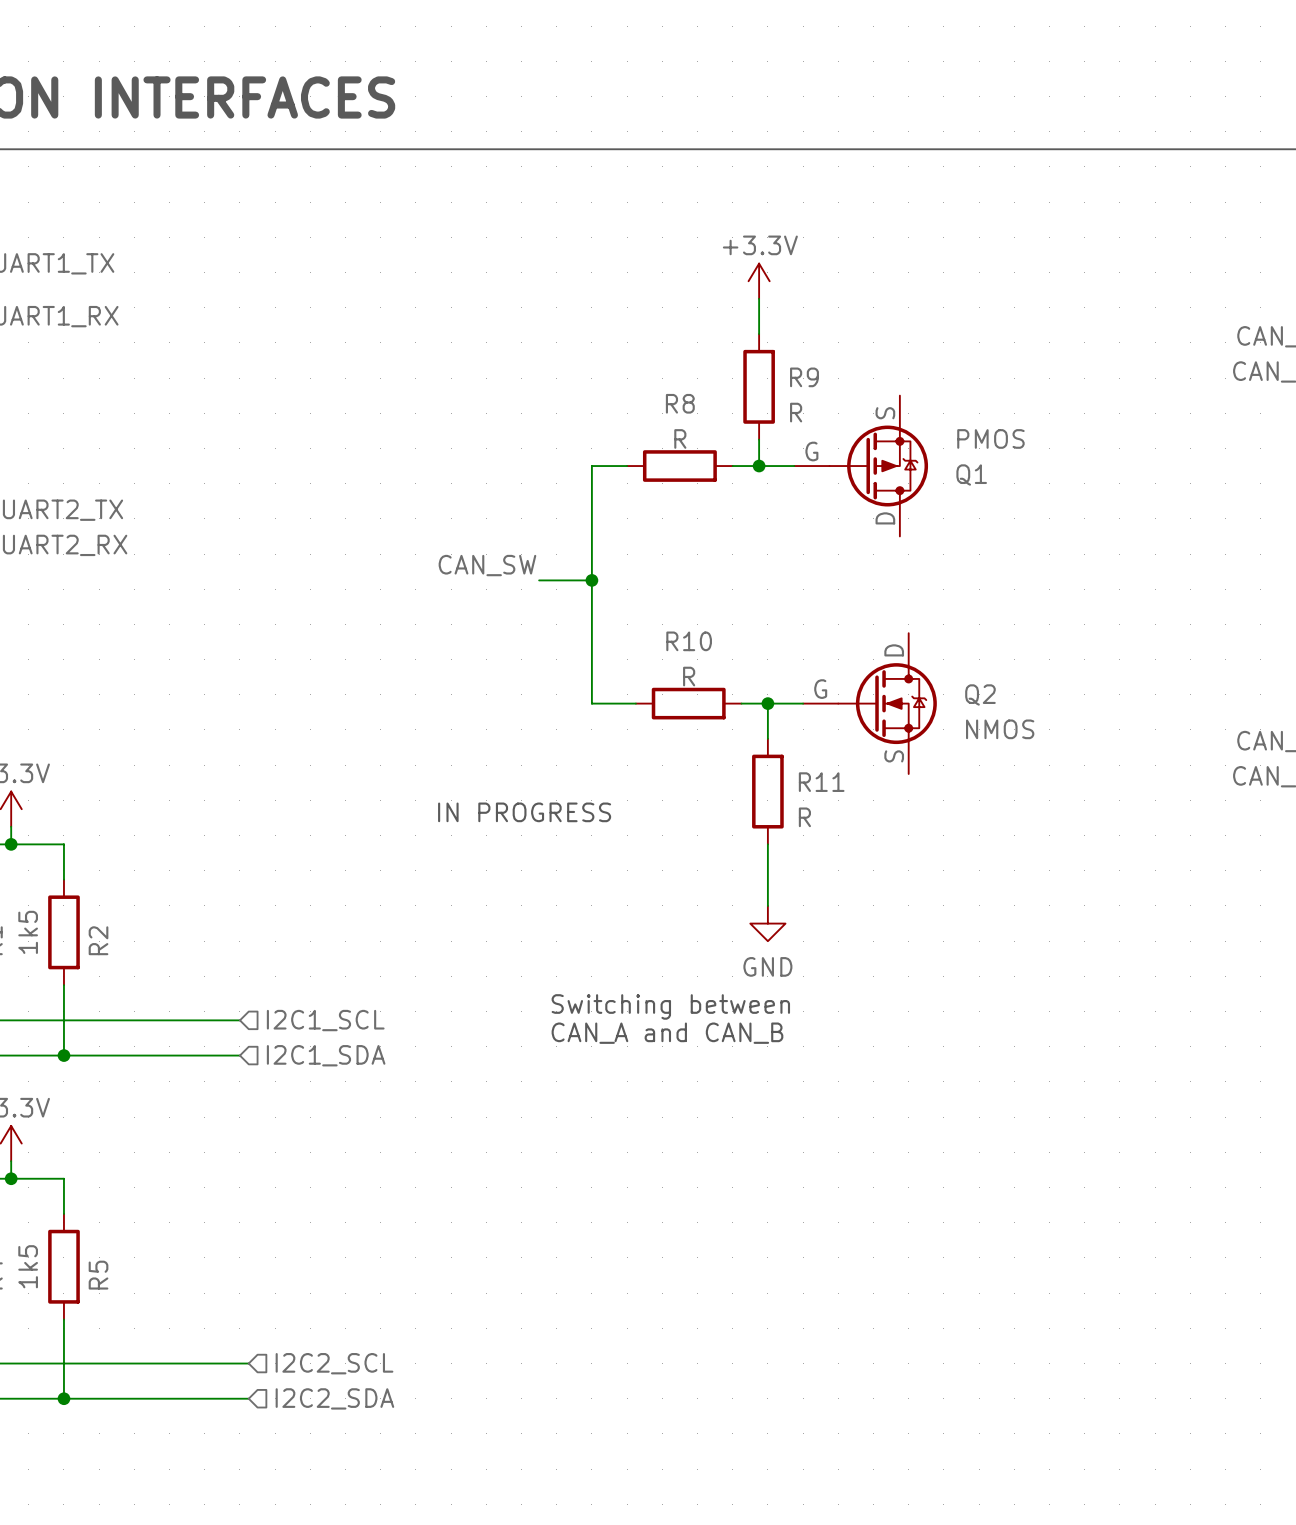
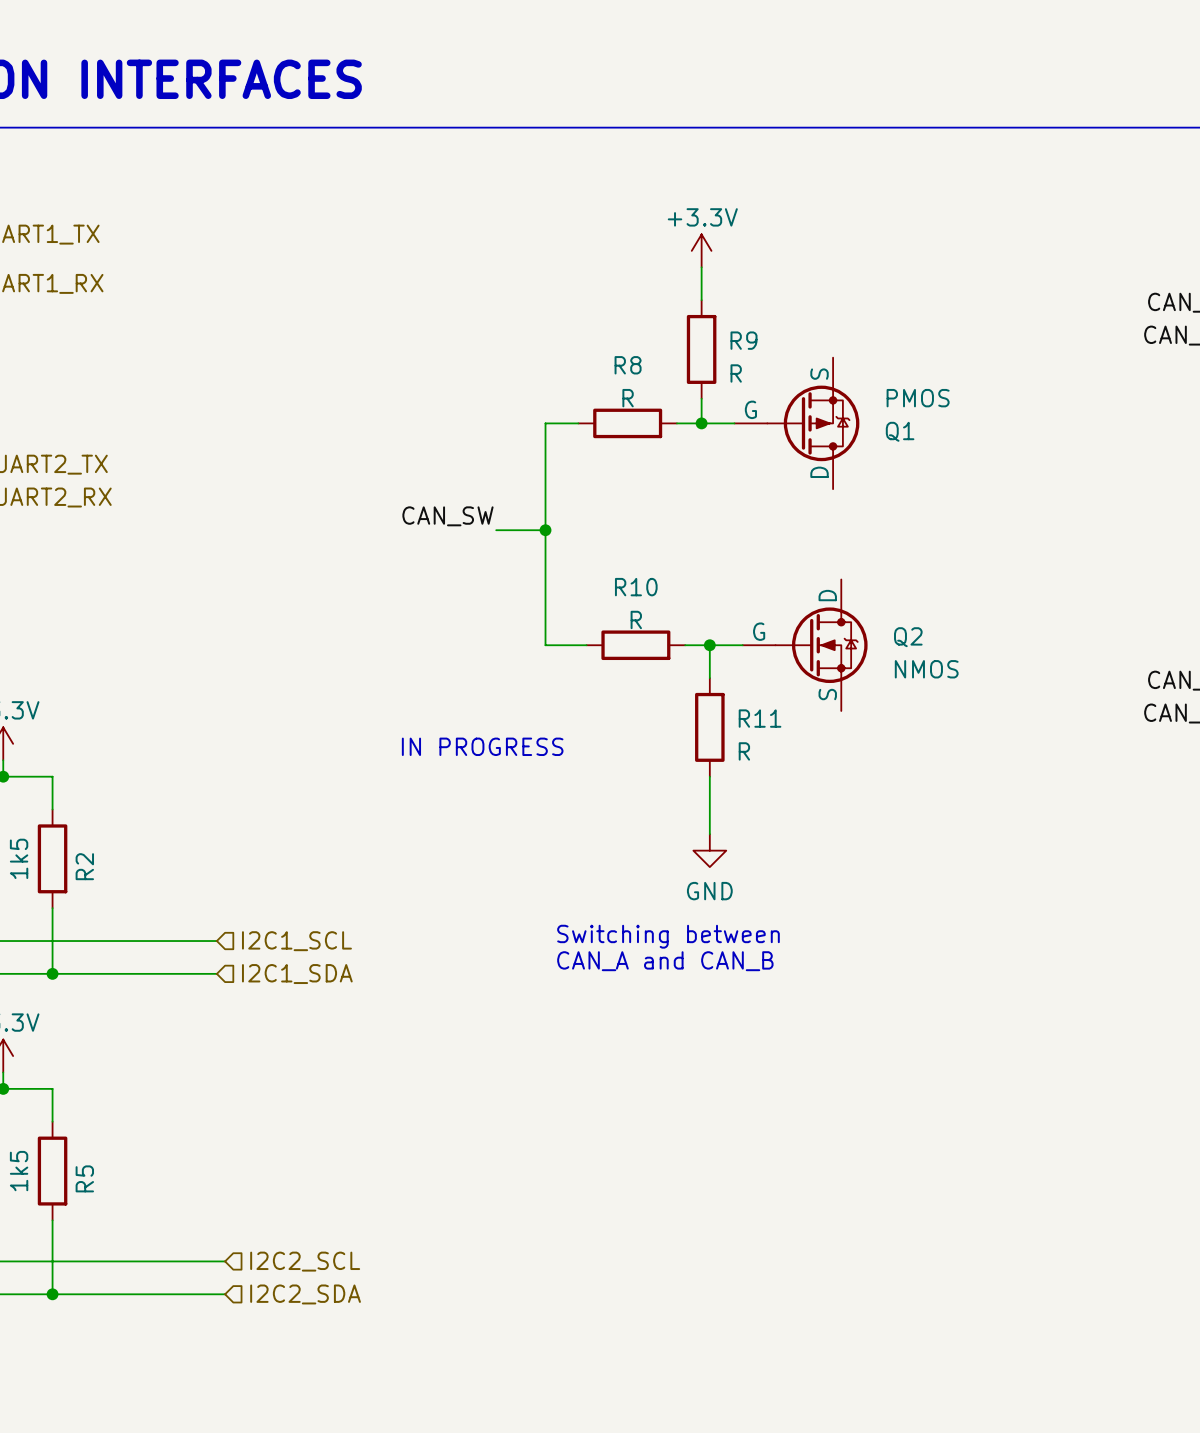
text position: Switching between (670, 1006) -> Switching between (668, 936)
text position: CAN_A and CAN_B (667, 1033) -> CAN_A and CAN_B (665, 961)

